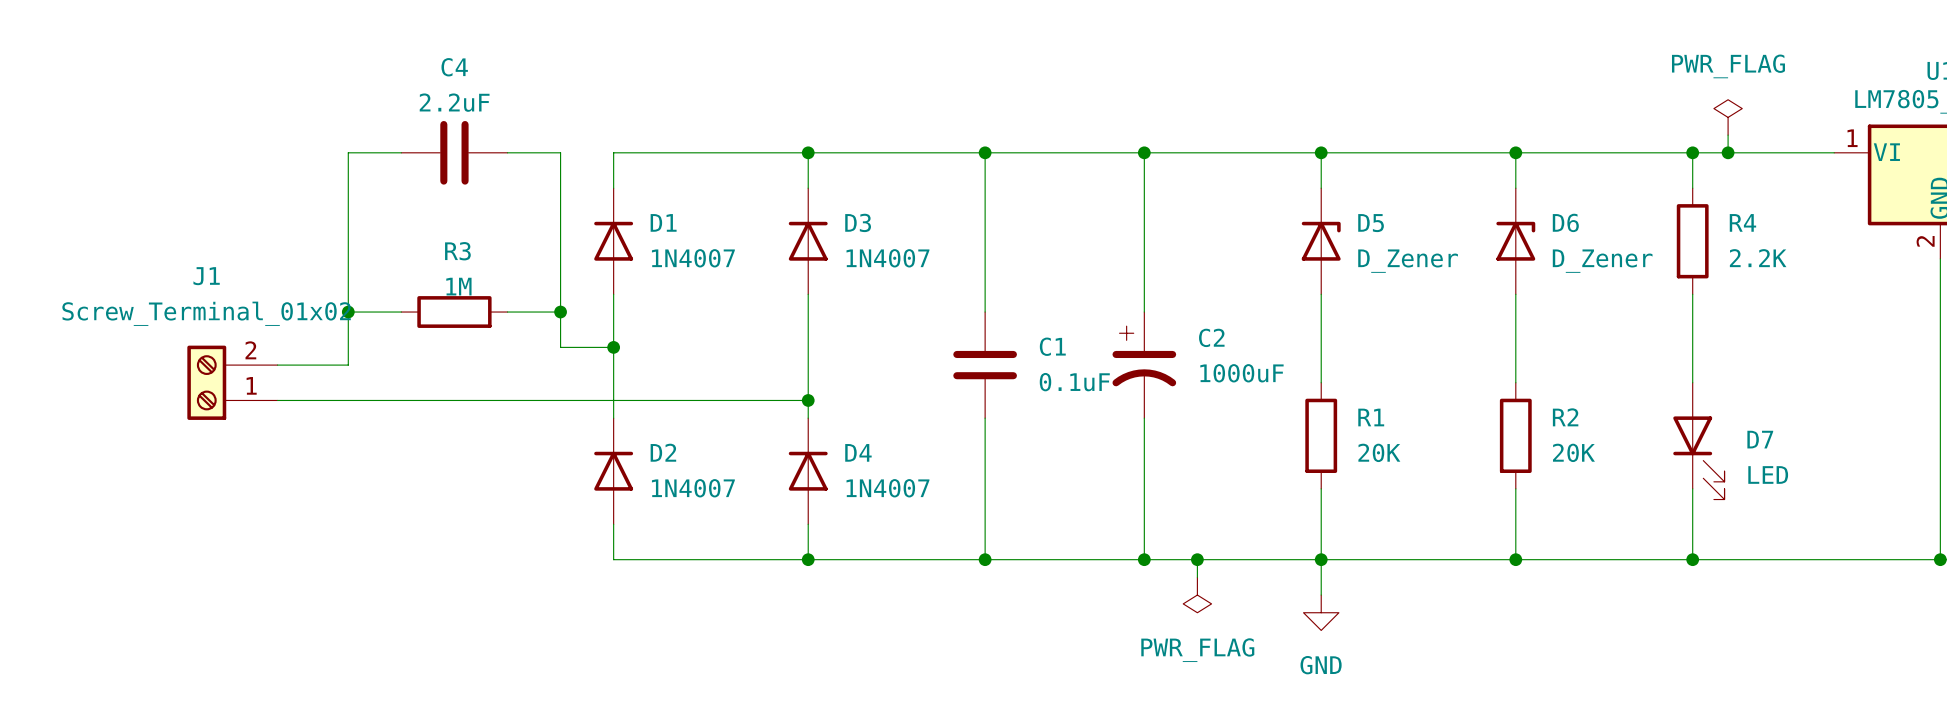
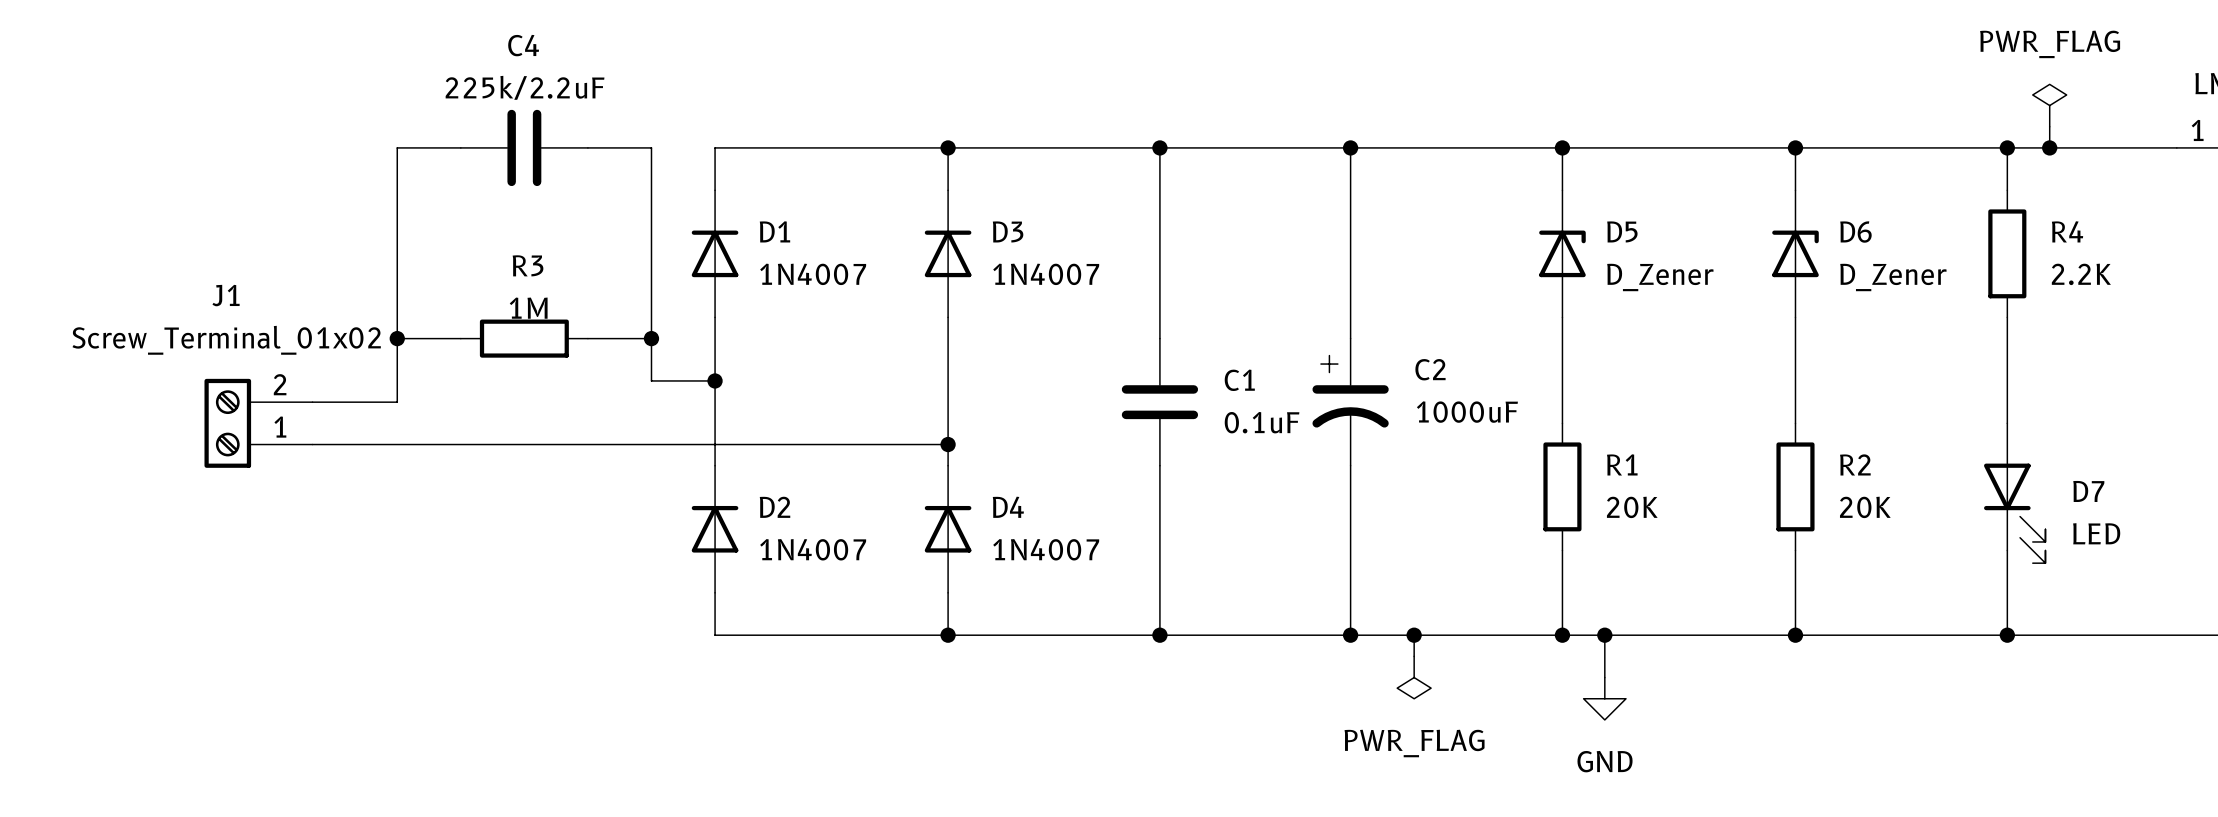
C4 value: 2.2uF (454, 102) -> 225k/2.2uF (525, 87)
wire: (1321, 559) (1321, 595) -> (1604, 635) (1604, 677)
junction: none -> (1604, 635)
power symbol position: GND (1321, 612) -> GND (1604, 698)

